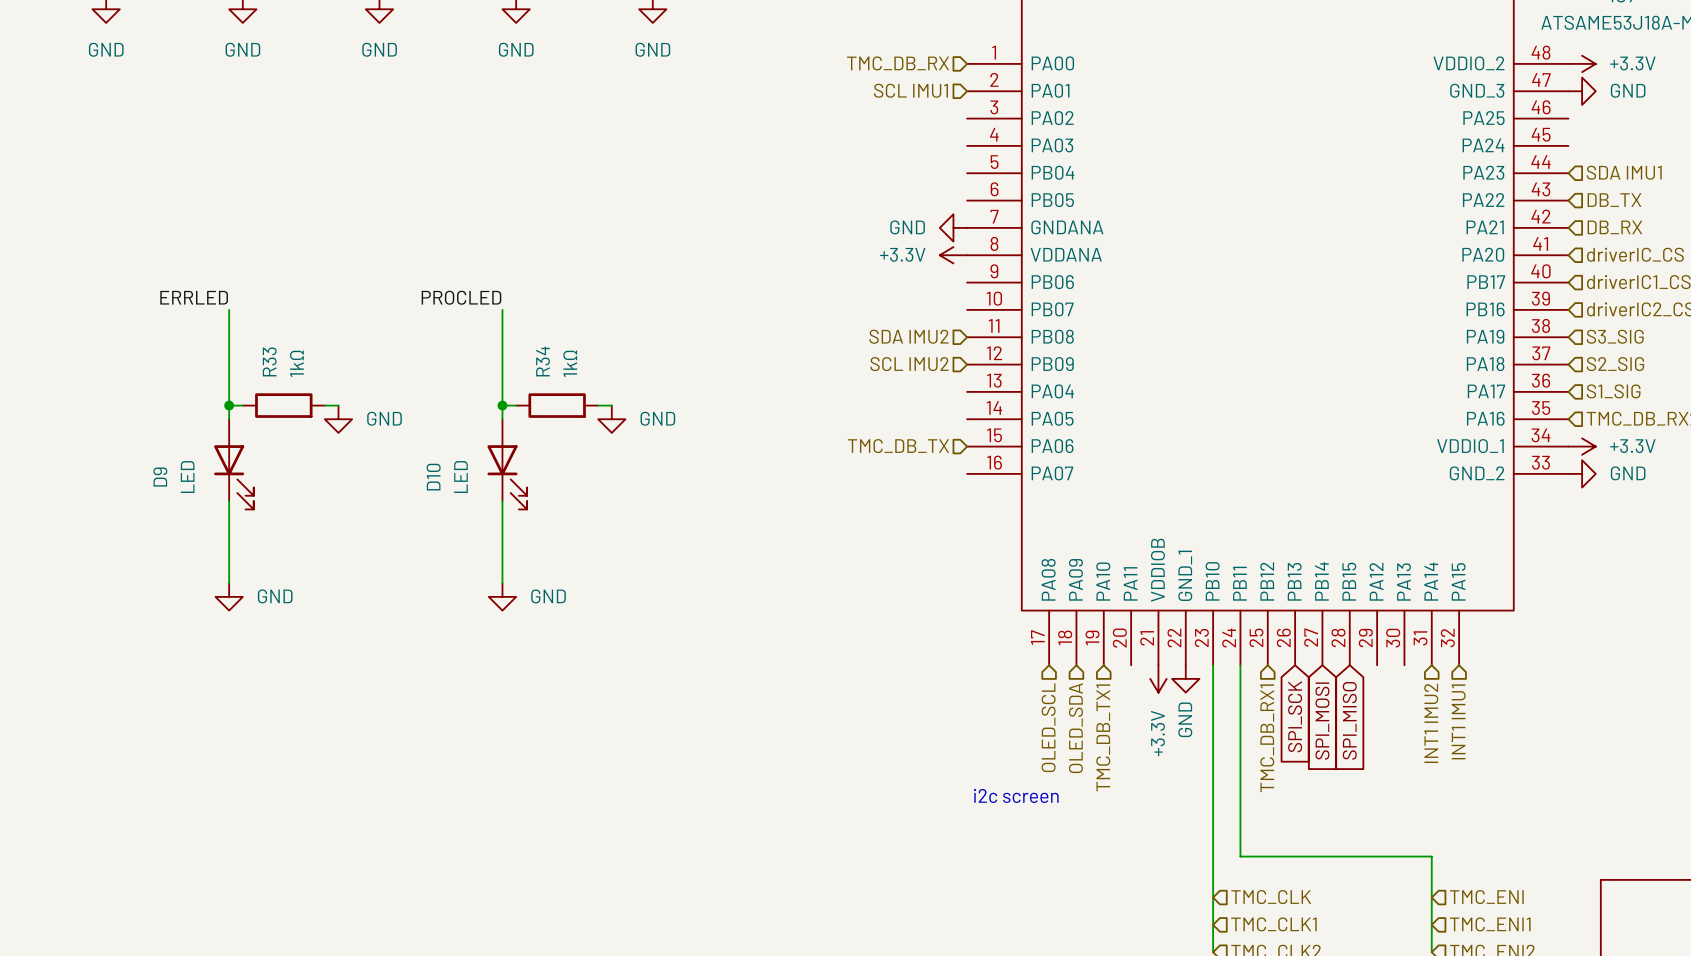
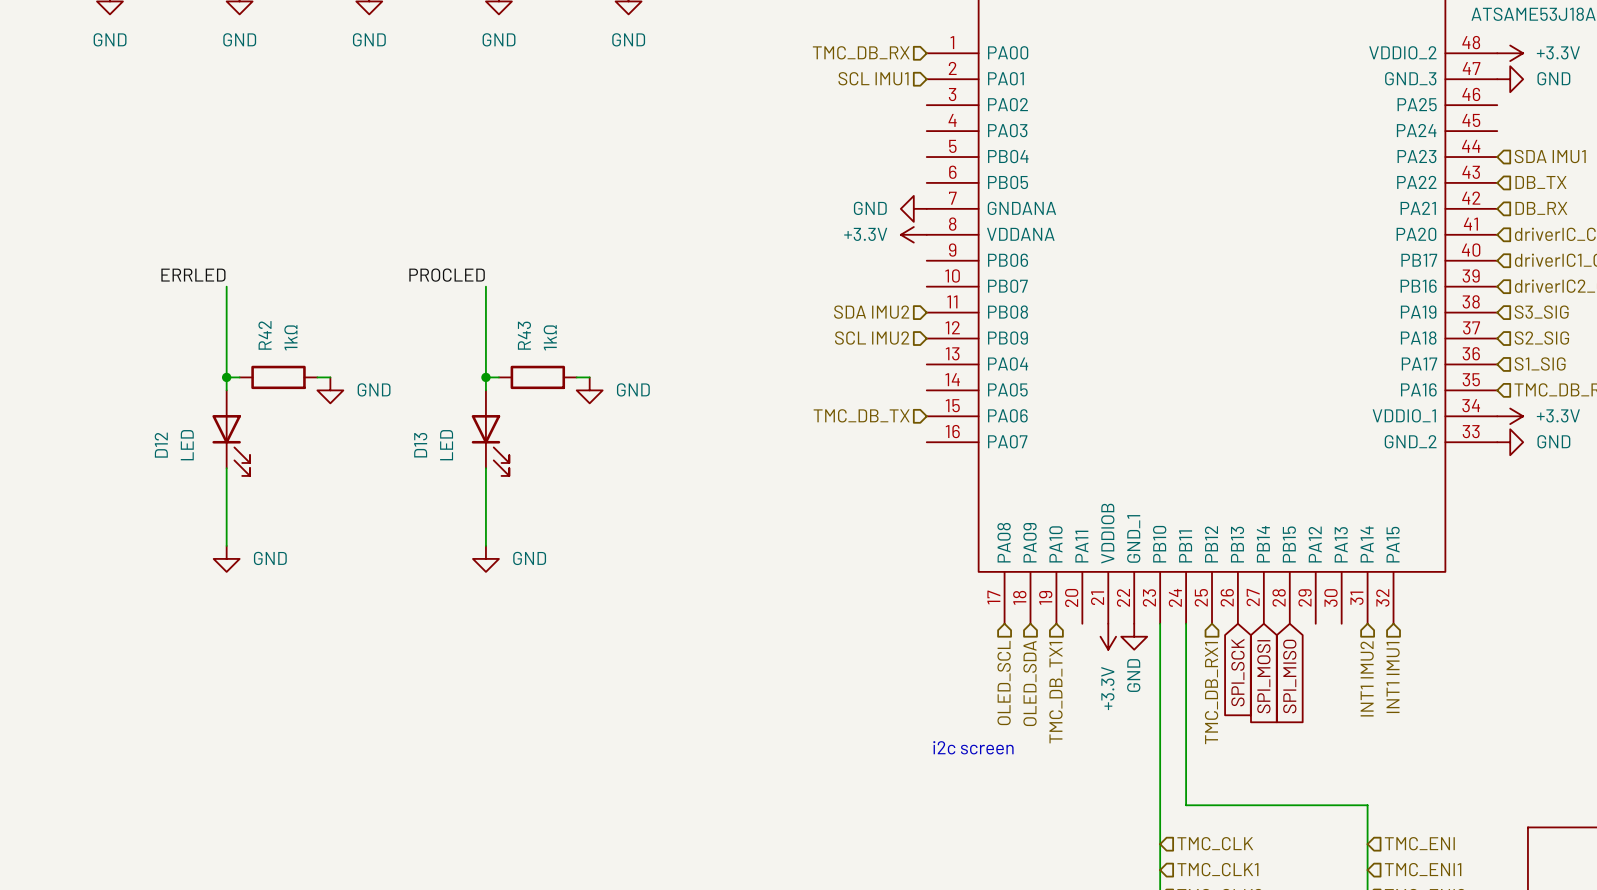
R33 name: R33 (269, 361) -> R42 (264, 335)
R34 name: R34 (543, 361) -> R43 (524, 335)
D9 name: D9 (160, 477) -> D12 (161, 445)
D10 name: D10 (433, 477) -> D13 (420, 445)

